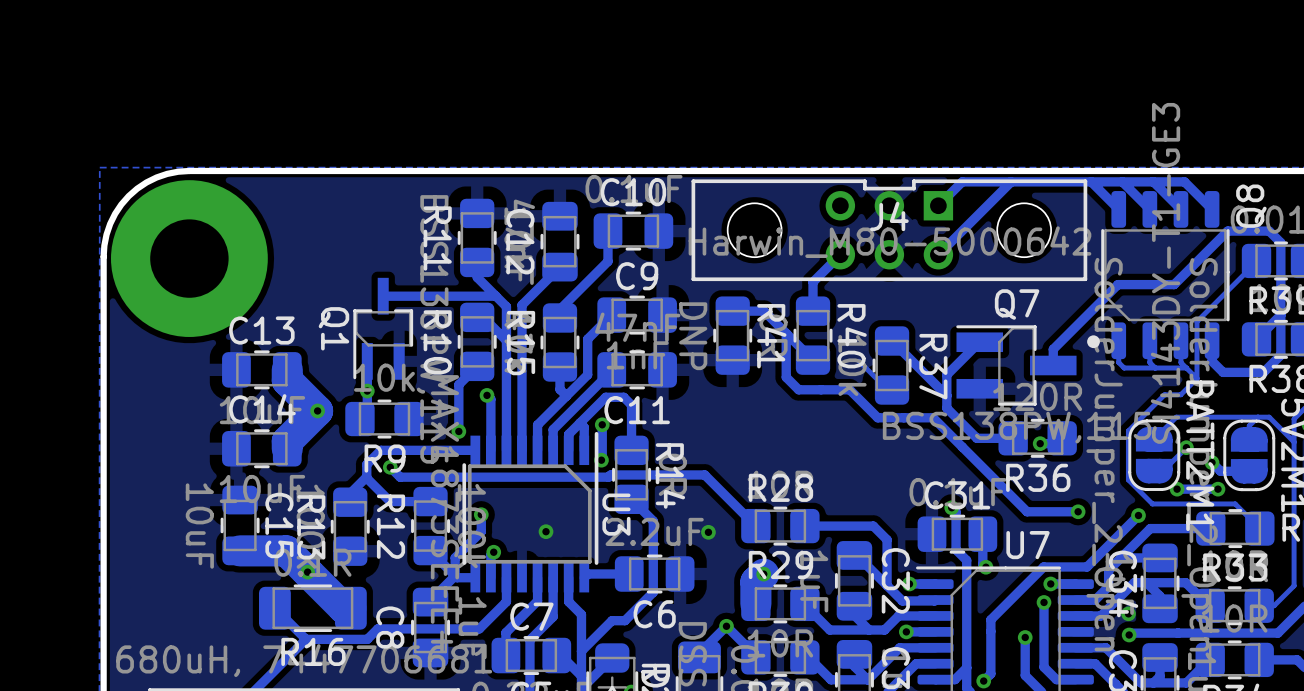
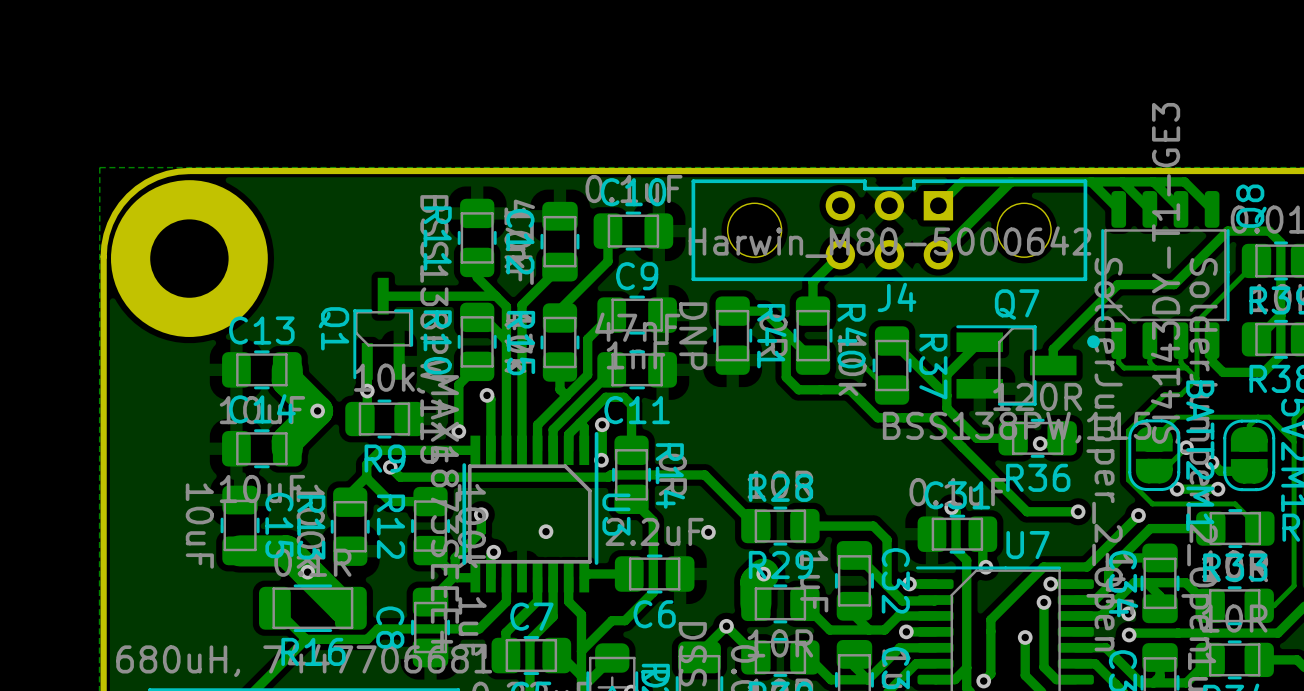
J4 name position: J4 (889, 216) -> J4 (897, 297)

